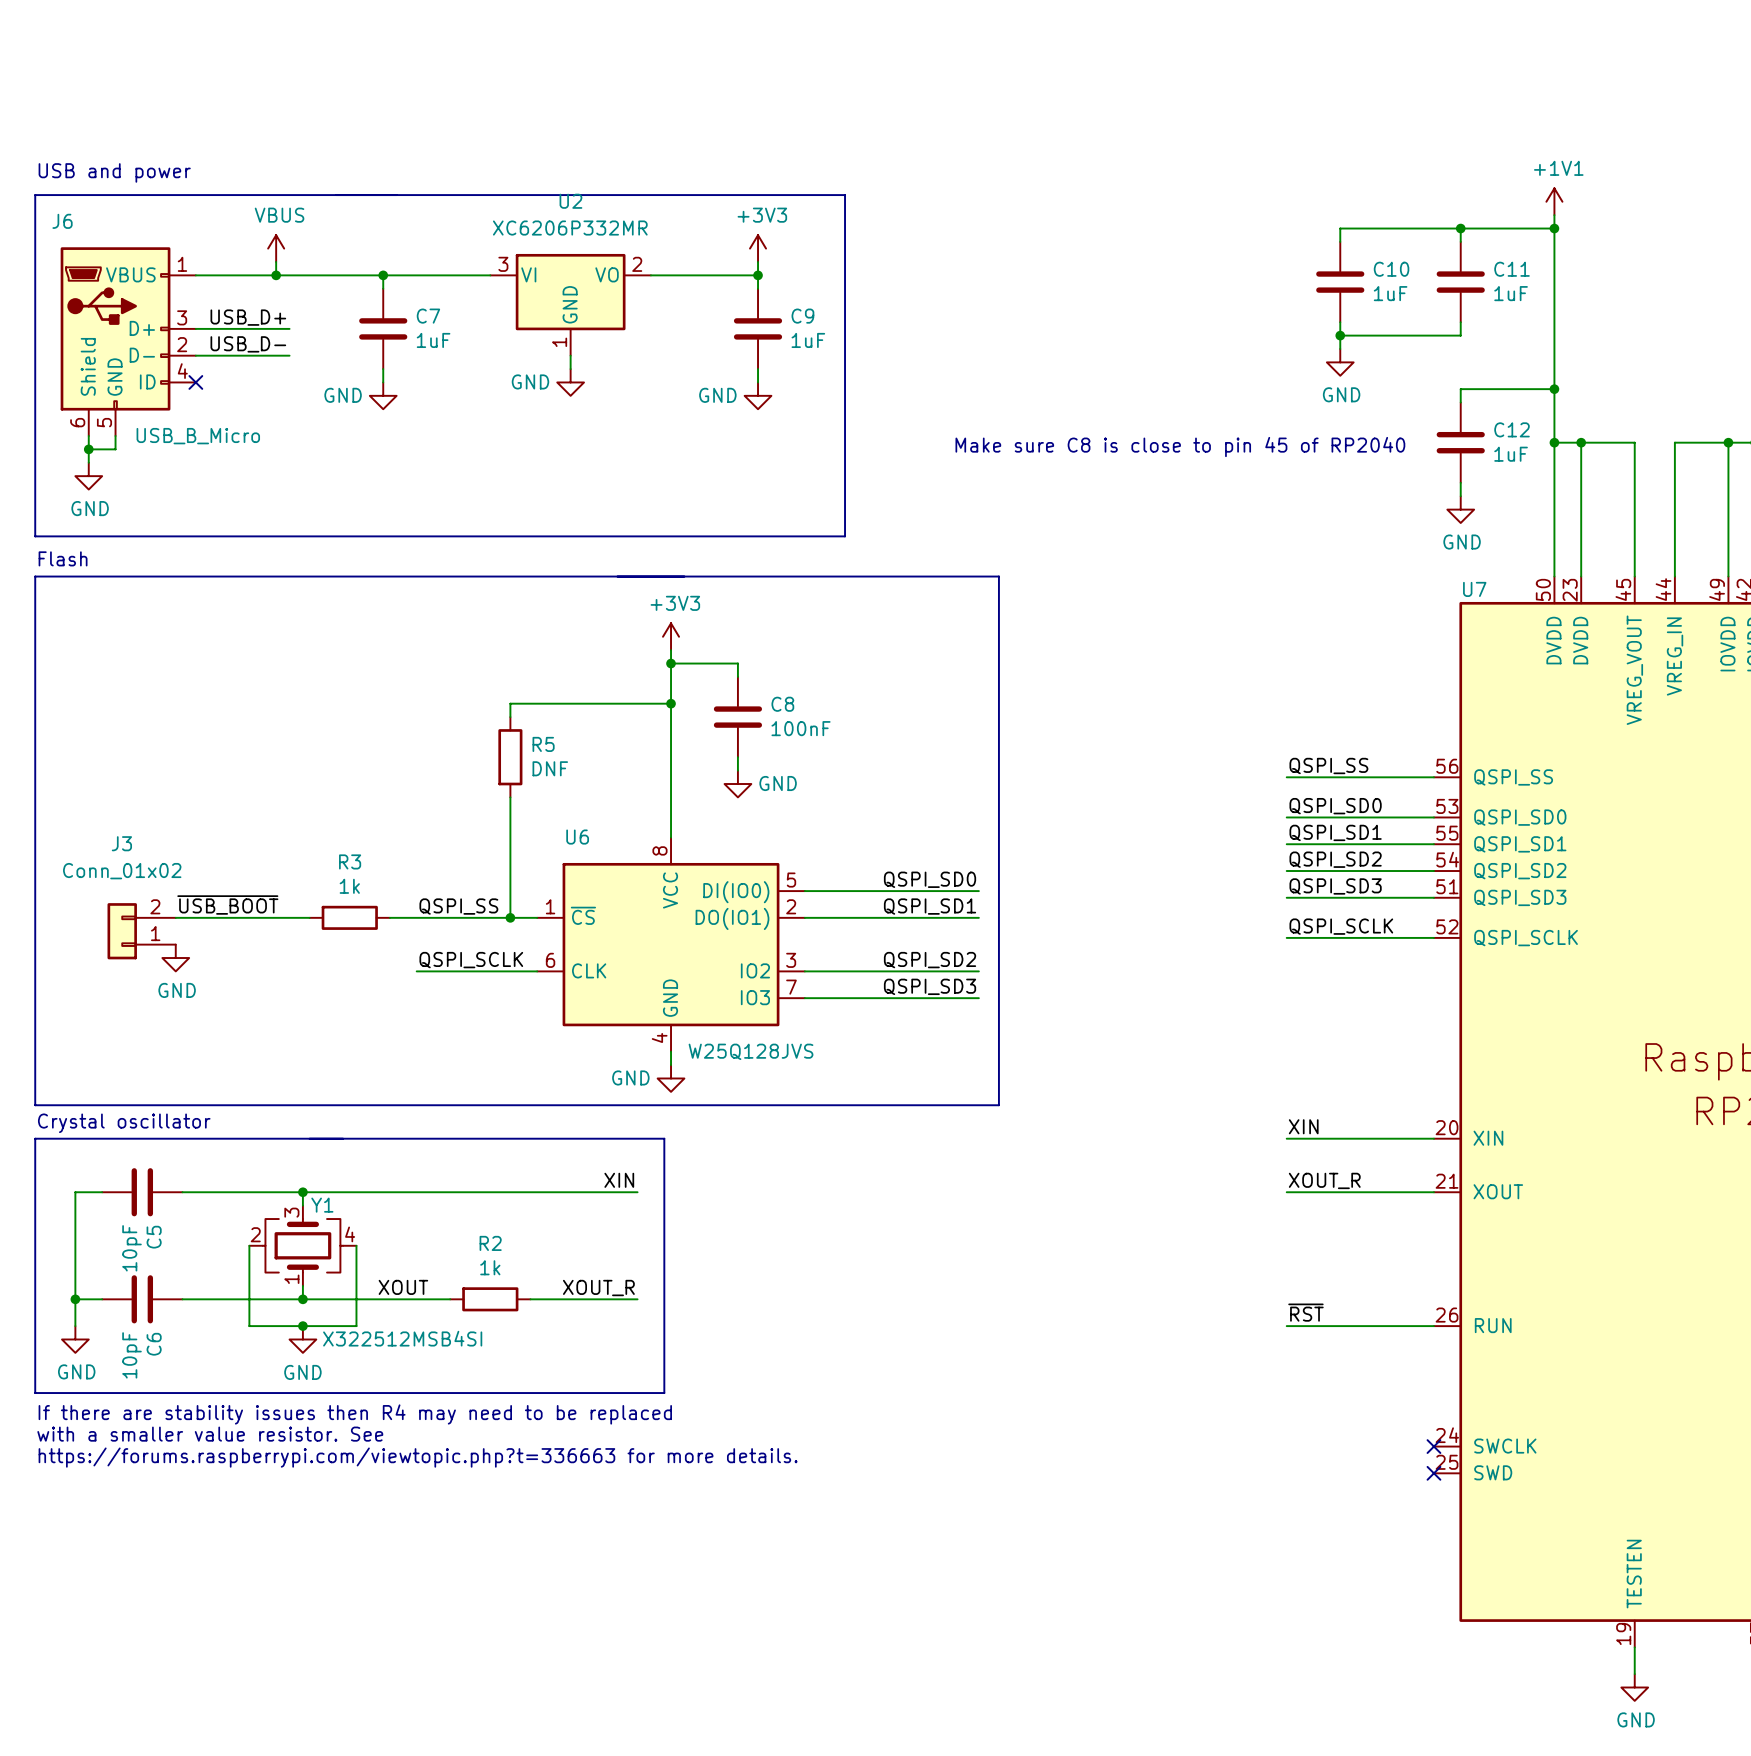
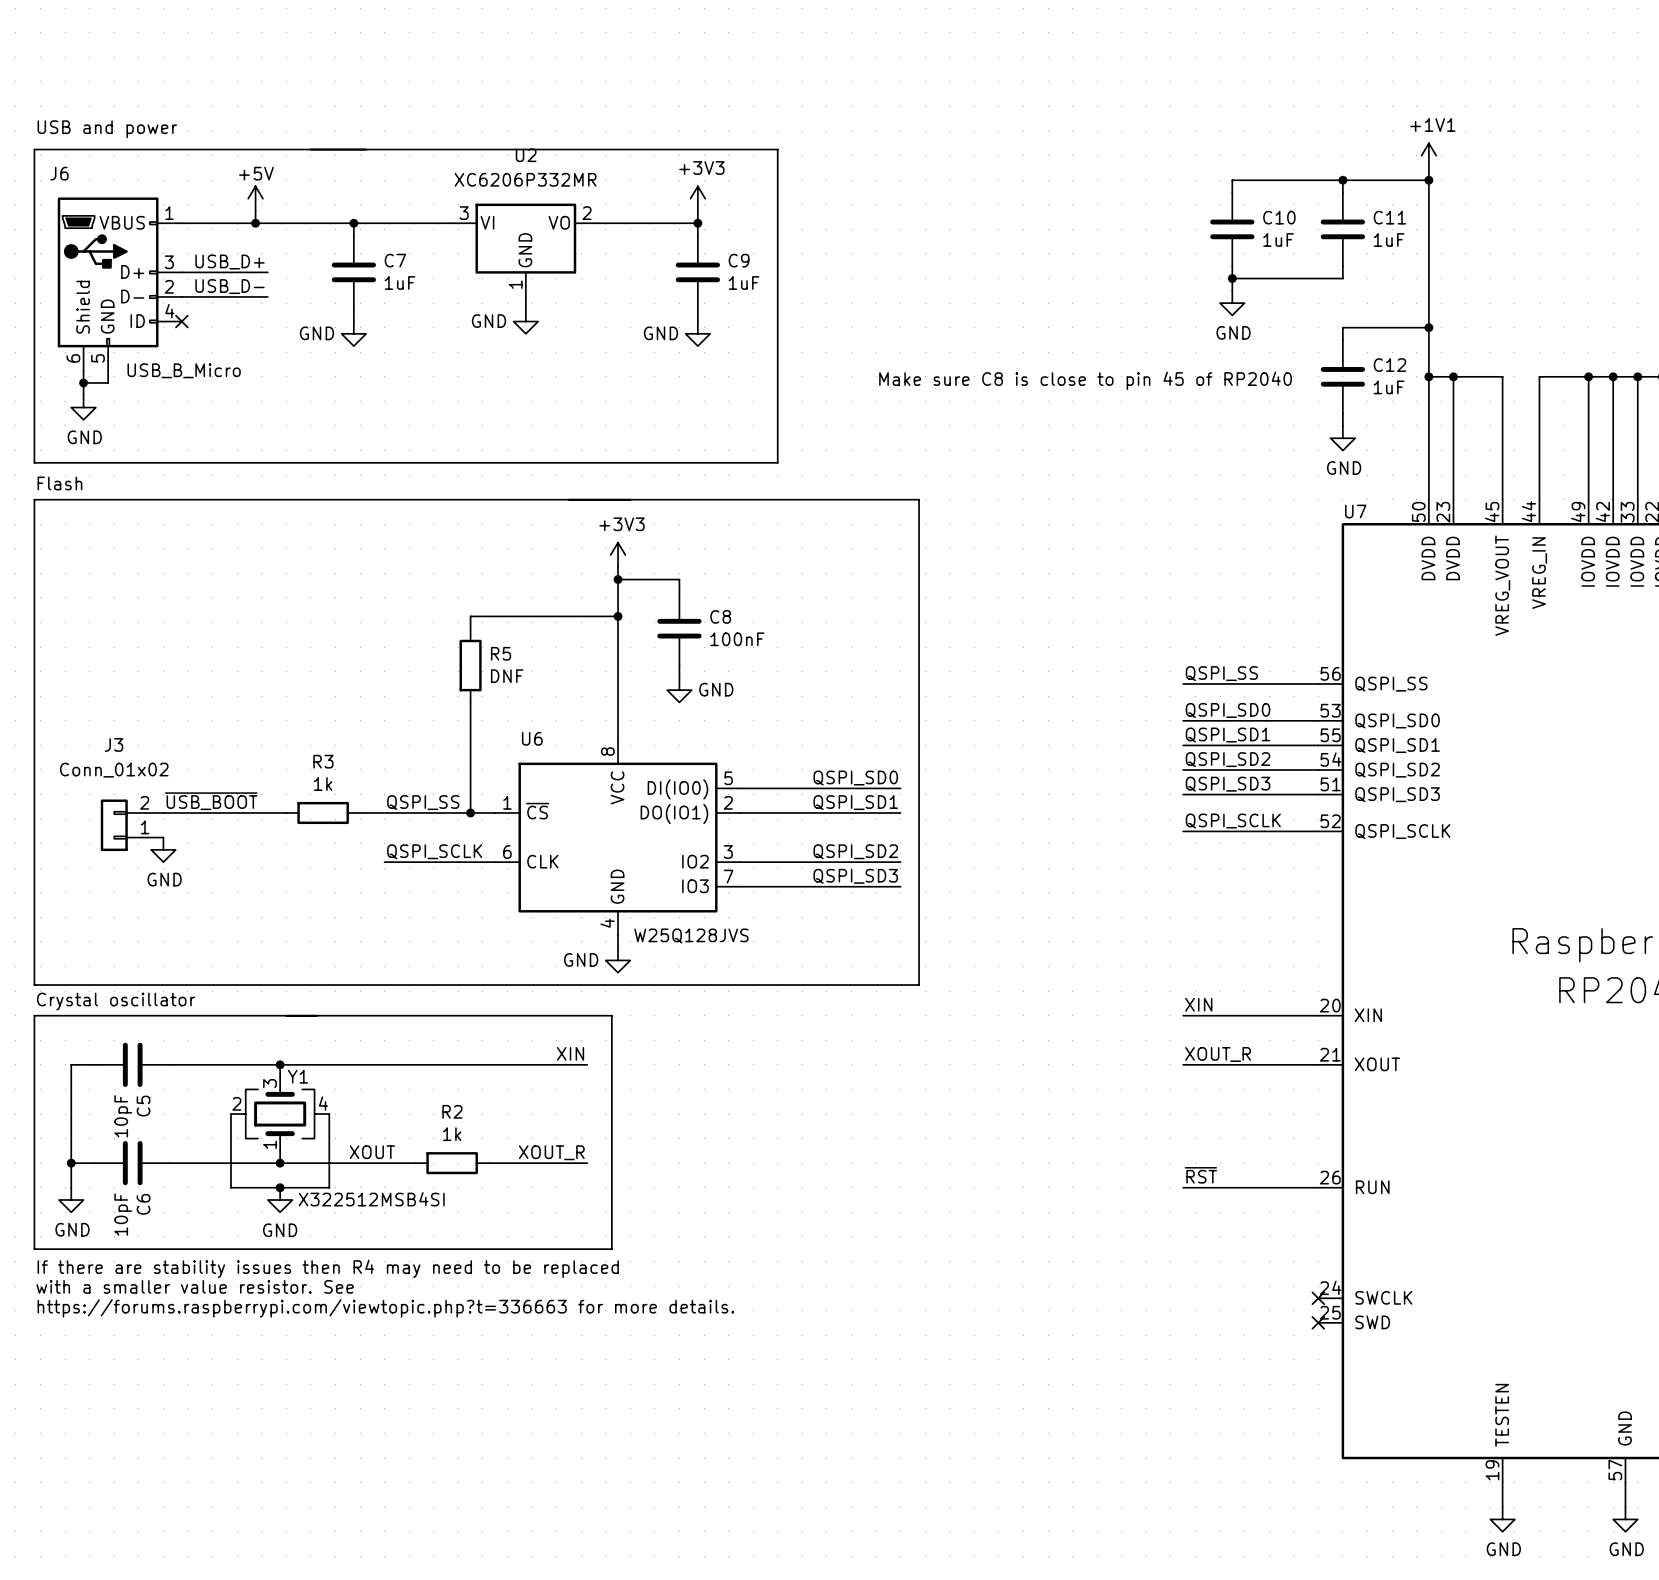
power symbol: VBUS (276, 248) -> +5V (255, 198)

